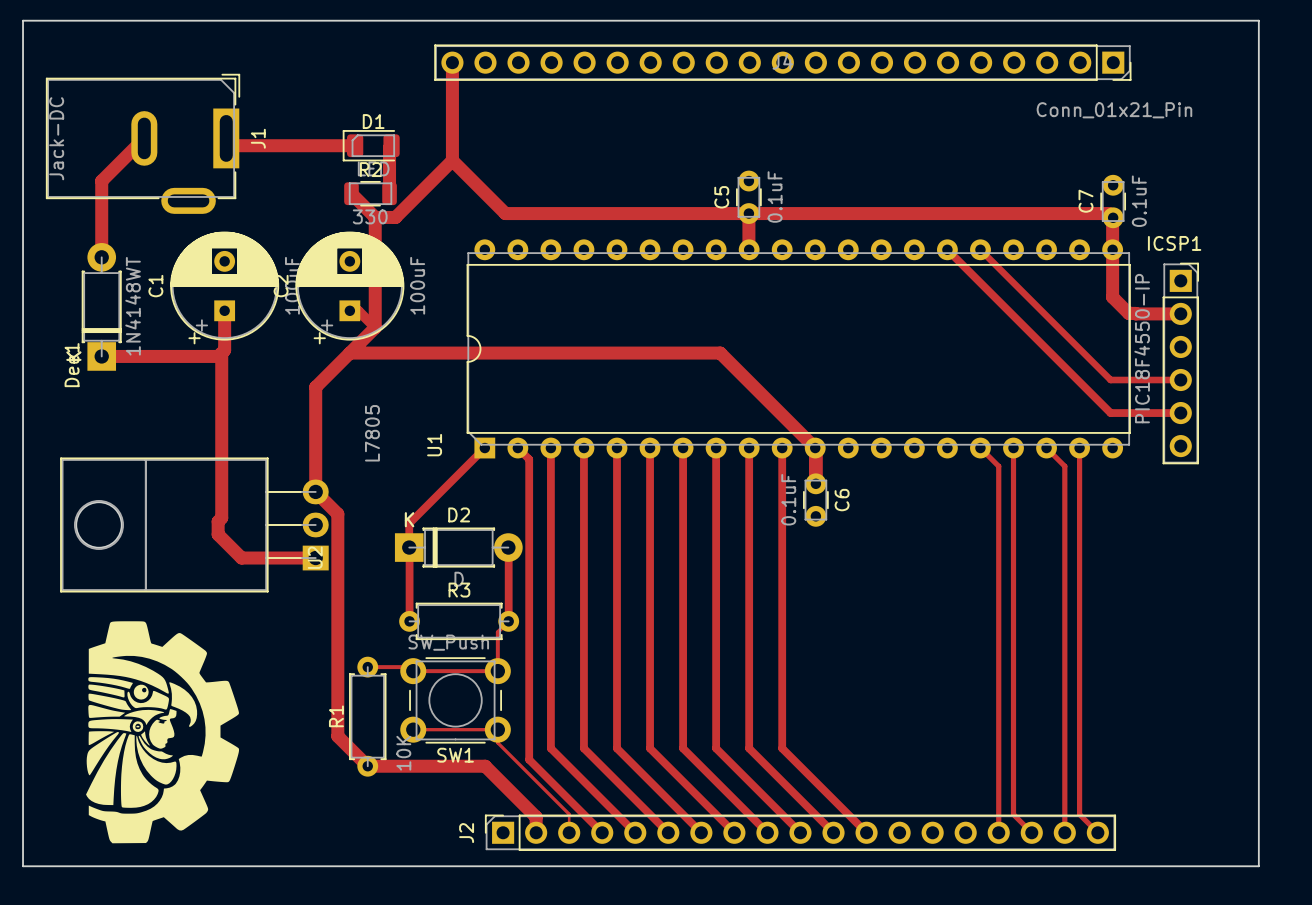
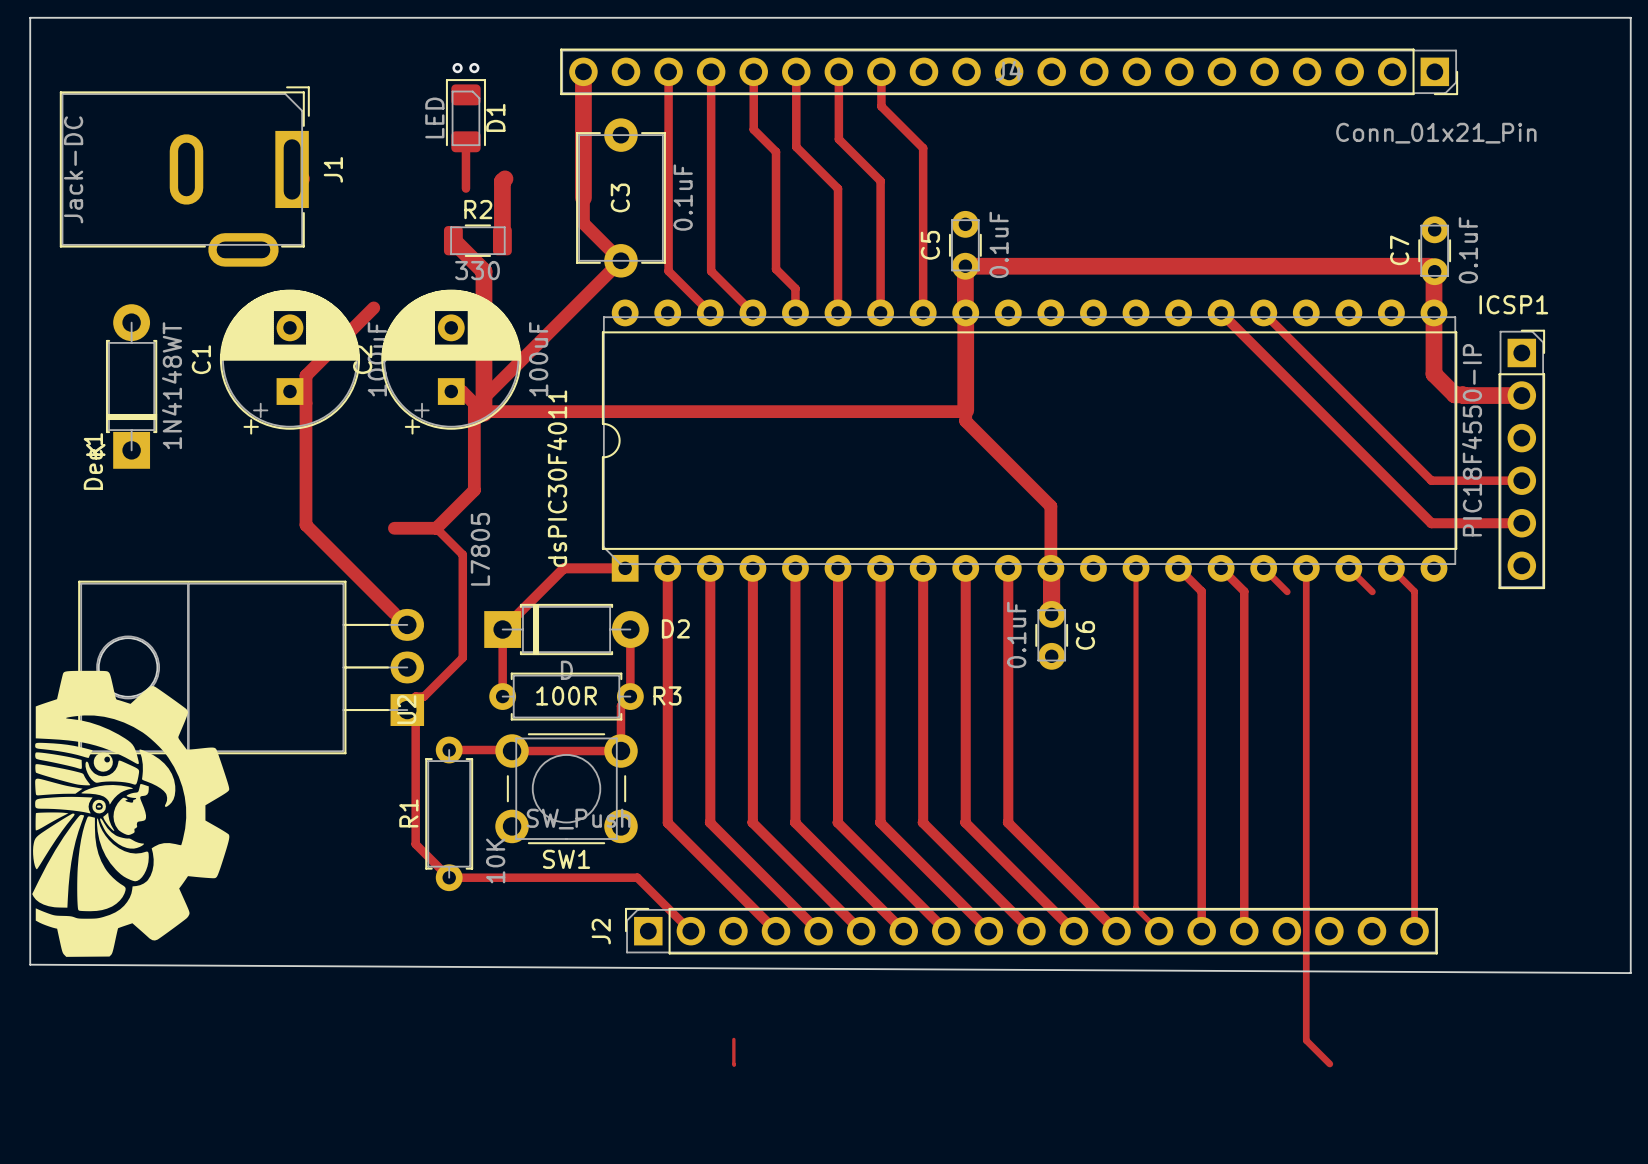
board edge: (1258, 20) (1258, 866) (23, 866) (23, 755) -> (1622, 17) (1630, 17) (1630, 973) (30, 964)
via: none -> (457, 68)
via: none -> (474, 68)
track: none -> (668, 71) (668, 271) (710, 312)
track: none -> (711, 71) (711, 271) (752, 312)
track: none -> (753, 71) (753, 129) (776, 151) (776, 269) (795, 288) (795, 312)
track: none -> (796, 71) (796, 147) (838, 188) (838, 312)
track: none -> (838, 71) (838, 139) (880, 181) (880, 312)
track: none -> (881, 71) (881, 106) (923, 148) (923, 312)
track: none -> (465, 141) (465, 188)
track: (144, 138) (101, 181) (101, 257) -> none
track: (233, 145) (355, 145) -> none
D1 rotation: 0° (371, 145) -> 90° clockwise (465, 115)
D1 position: (371, 145) -> (465, 115)
track: none -> (583, 198) (583, 223) (620, 260) (474, 407) (474, 490) (436, 528)
C3: none -> 0.1uF (620, 197)
track: (748, 213) (505, 213) (452, 160) (395, 217) (375, 217) -> none
track: none -> (373, 307) (305, 375) (305, 525) (394, 613)
track: none -> (965, 316) (965, 410)
track: (224, 313) (224, 310) (224, 350) (218, 356) (101, 356) -> none
track: none -> (965, 410) (474, 411)
track: (375, 327) (315, 387) (315, 491) (337, 514) (337, 736) (367, 766) (485, 766) (536, 817) (536, 832) -> none
track: (221, 353) (221, 517) (218, 521) (218, 534) (241, 558) (315, 558) -> none
track: (349, 353) (720, 353) (815, 448) -> (965, 410) (965, 421) (1050, 506) (1050, 568)
track: none -> (394, 528) (436, 528)
track: none -> (436, 528) (462, 554) (462, 657) (424, 696) (415, 696) (415, 844) (449, 877) (637, 877) (690, 931)
U1 name: U1 (434, 445) -> dsPIC30F4011 (557, 478)
track: (484, 448) (409, 523) (409, 621) -> (625, 568) (563, 568) (502, 629) (502, 696)
track: (517, 448) (529, 459) (529, 759) (602, 832) -> (667, 568) (667, 822) (776, 931)
track: none -> (1136, 568) (1136, 908)
track: none -> (1221, 568) (1244, 591) (1244, 931)
track: (1079, 448) (1079, 814) (1097, 832) -> (1391, 568) (1414, 591) (1414, 931)
track: none -> (1202, 591) (1178, 568) (1201, 591) (1201, 931)
track: (998, 466) (998, 832) -> none
track: (1064, 466) (1064, 832) -> none
track: none -> (630, 629) (630, 696) (620, 705) (620, 751) (449, 750)
D2 name position: D2 (459, 514) -> D2 (675, 628)
D2 footprint: [394, 527, 523, 568] -> [484, 603, 649, 656]
R3 value: none -> 100R (566, 695)
track: (508, 547) (508, 621) (497, 632) (497, 671) (413, 671) (409, 667) (367, 667) -> none
R3 name position: R3 (459, 590) -> R3 (667, 695)
R3 position: (459, 621) -> (566, 696)
track: (550, 644) (550, 748) (635, 832) -> (710, 822) (818, 931)
track: (583, 644) (583, 748) (668, 832) -> (752, 822) (861, 931)
track: (616, 644) (616, 748) (701, 832) -> (795, 822) (903, 931)
track: (650, 644) (650, 748) (734, 832) -> (838, 822) (946, 931)
track: (683, 644) (683, 748) (767, 832) -> (880, 822) (988, 931)
track: (716, 644) (716, 748) (800, 832) -> (923, 822) (1031, 931)
track: (749, 644) (749, 748) (833, 832) -> (965, 822) (1073, 931)
track: (782, 644) (782, 748) (866, 832) -> (1008, 822) (1116, 931)
SW1 position: (455, 700) -> (566, 788)
track: none -> (1135, 907) (1159, 931)
R1 position: (367, 716) -> (449, 813)
track: (413, 729) (497, 729) (497, 742) (569, 814) -> none
drawing position: (162, 732) -> (130, 813)
J2 position: (800, 832) -> (1031, 931)

